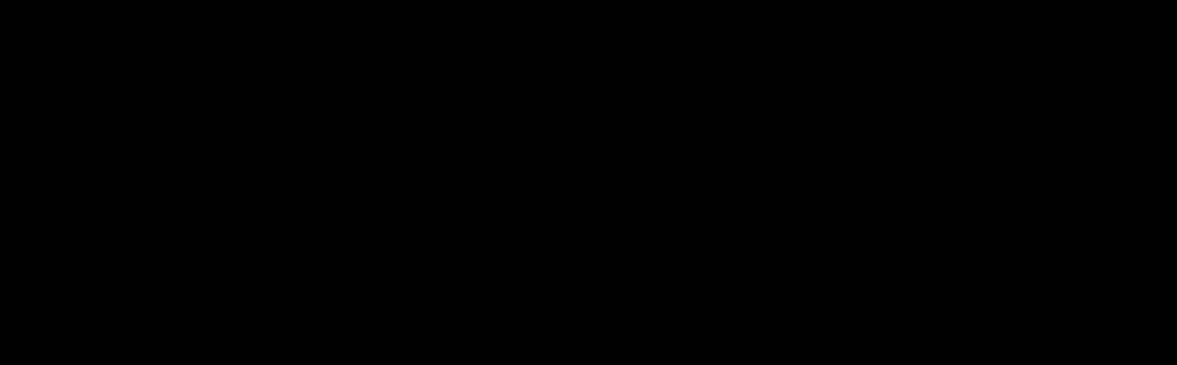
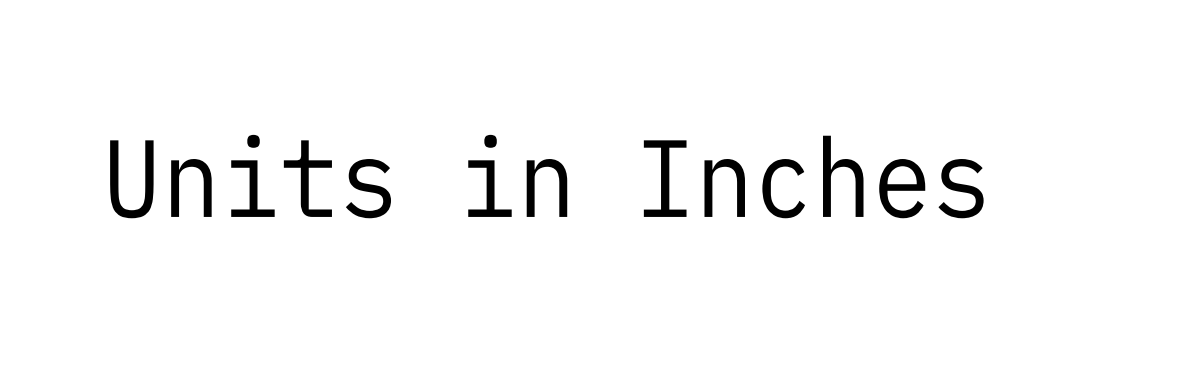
text: none -> Units in Inches (546, 176)

